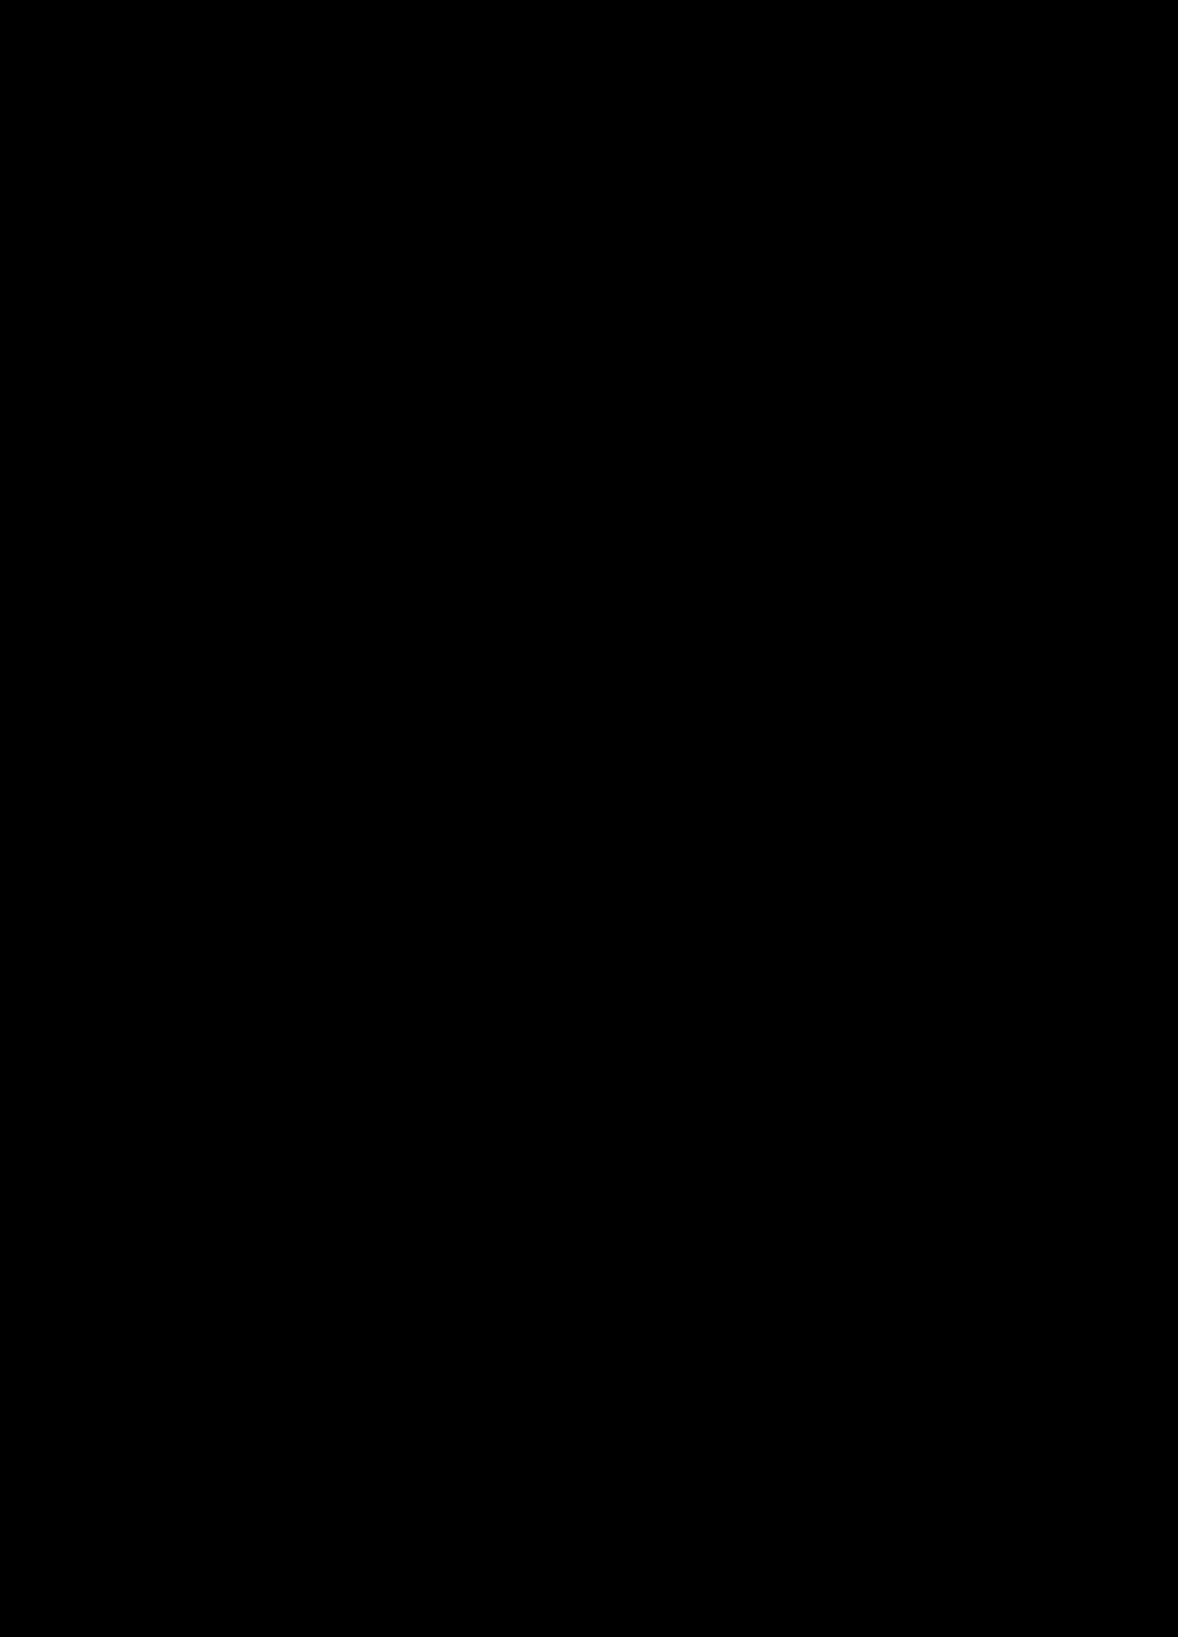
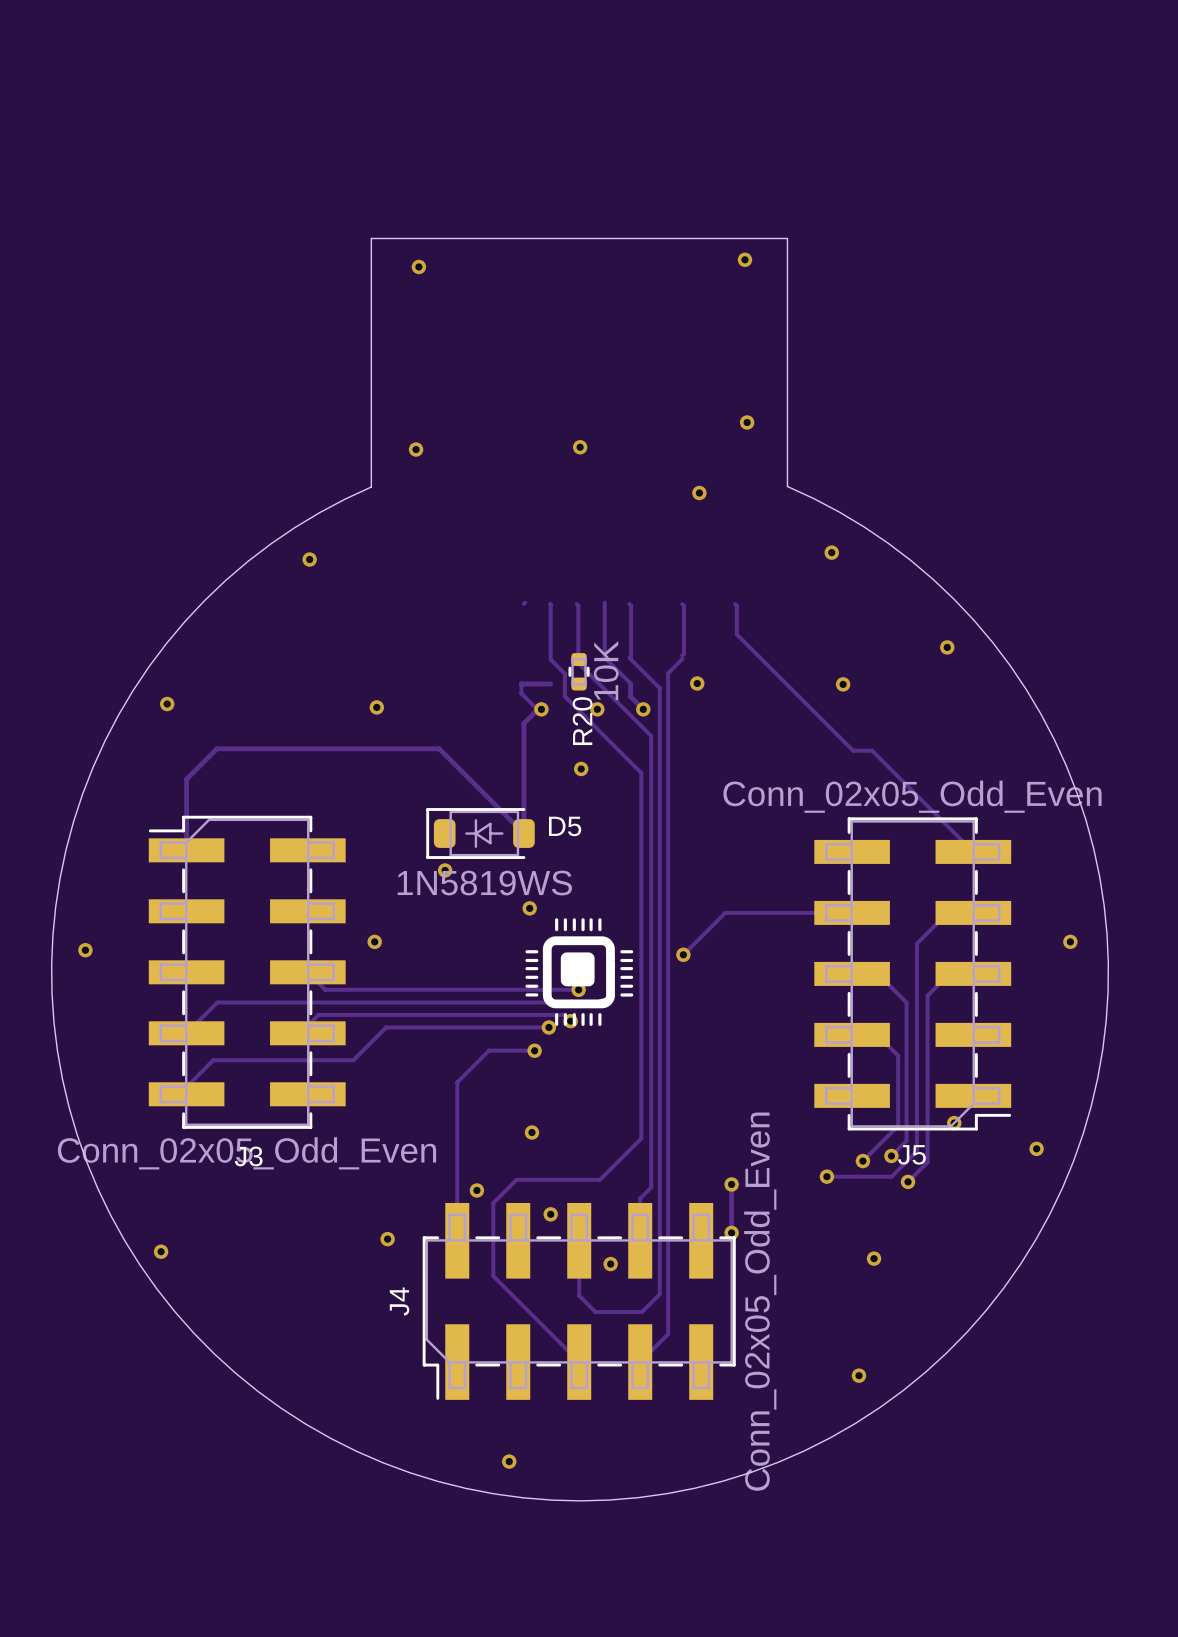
board edge: none -> (371, 238) (371, 487) (345, 499) (294, 527) (247, 561) (204, 600) (166, 643) (133, 690) (104, 741) (82, 794) (66, 849) (60, 878) (55, 906) (51, 964) (52, 993) (57, 1050) (69, 1107) (86, 1162) (110, 1215) (124, 1240) (156, 1288) (193, 1333) (235, 1373) (281, 1408) (330, 1438) (383, 1462) (437, 1481) (494, 1493) (522, 1497) (551, 1500) (609, 1500) (667, 1493) (723, 1481) (778, 1462) (830, 1437) (855, 1423) (903, 1390) (925, 1372) (967, 1332) (1004, 1287) (1036, 1239) (1049, 1214) (1073, 1161) (1091, 1106) (1102, 1049) (1108, 991) (1107, 934) (1099, 876) (1086, 820) (1066, 766) (1041, 714) (1010, 665) (973, 620) (933, 579) (888, 543) (839, 512) (787, 486) (787, 238) (371, 238)
via: none -> (744, 259)
via: none -> (418, 266)
via: none -> (747, 422)
via: none -> (580, 447)
via: none -> (416, 449)
via: none -> (699, 492)
via: none -> (831, 552)
via: none -> (309, 559)
track: none -> (525, 602) (523, 604)
track: none -> (604, 602) (604, 657) (630, 683) (630, 696) (643, 709)
track: none -> (550, 604) (550, 659) (564, 673) (564, 696) (641, 773) (641, 1138) (599, 1179) (516, 1179) (493, 1203) (493, 1276) (579, 1362)
track: none -> (576, 604) (578, 605) (578, 656) (576, 658)
track: none -> (629, 604) (631, 605) (631, 656) (629, 657)
track: none -> (682, 604) (683, 605) (683, 653) (682, 655)
track: none -> (735, 604) (736, 605) (736, 634) (853, 750) (872, 750) (973, 851)
via: none -> (947, 647)
track: none -> (579, 659) (579, 663) (651, 735) (651, 1187) (640, 1198) (640, 1240)
track: none -> (630, 659) (659, 688) (659, 1294) (642, 1312) (595, 1312) (579, 1295) (579, 1240)
track: none -> (682, 659) (668, 673) (668, 1334) (640, 1362)
R20: none -> 10K (579, 671)
via: none -> (697, 683)
track: none -> (521, 684) (550, 684)
track: none -> (522, 684) (521, 693) (537, 709) (541, 709) (537, 709) (523, 723) (523, 833) (439, 748) (216, 748) (186, 779) (186, 850)
via: none -> (843, 684)
via: none -> (167, 704)
via: none -> (376, 707)
via: none -> (541, 709)
via: none -> (597, 709)
via: none -> (643, 709)
via: none -> (581, 768)
D5: none -> 1N5819WS (480, 833)
via: none -> (445, 870)
via: none -> (529, 908)
track: none -> (852, 912) (725, 912) (683, 954)
track: none -> (973, 912) (947, 912) (916, 943) (916, 1151) (891, 1176) (826, 1176)
drawing: none -> [525, 918, 634, 1026]
via: none -> (374, 941)
via: none -> (1070, 941)
via: none -> (85, 950)
via: none -> (683, 954)
J3: none -> Conn_02x05_Odd_Even (247, 972)
track: none -> (307, 972) (325, 989) (578, 989)
track: none -> (852, 973) (877, 973) (906, 1002) (906, 1140) (890, 1156)
J5: none -> Conn_02x05_Odd_Even (912, 973)
track: none -> (973, 973) (949, 973) (927, 995) (927, 1162) (908, 1181)
via: none -> (578, 989)
track: none -> (544, 1002) (217, 1002) (186, 1033)
track: none -> (570, 1021) (564, 1014) (318, 1014) (307, 1025) (307, 1033)
via: none -> (570, 1021)
track: none -> (548, 1027) (386, 1027) (353, 1060) (213, 1060) (186, 1086) (186, 1094)
via: none -> (548, 1027)
track: none -> (852, 1034) (877, 1034) (898, 1055) (898, 1125) (862, 1161)
track: none -> (534, 1050) (488, 1050) (457, 1082) (457, 1240)
via: none -> (534, 1050)
via: none -> (954, 1123)
via: none -> (531, 1132)
via: none -> (1036, 1148)
via: none -> (891, 1155)
via: none -> (862, 1161)
via: none -> (826, 1176)
via: none -> (908, 1181)
track: none -> (731, 1184) (731, 1232)
via: none -> (731, 1184)
via: none -> (476, 1190)
via: none -> (550, 1214)
via: none -> (731, 1232)
via: none -> (387, 1239)
via: none -> (161, 1251)
via: none -> (874, 1258)
via: none -> (610, 1264)
J4: none -> Conn_02x05_Odd_Even (579, 1301)
via: none -> (858, 1375)
via: none -> (509, 1461)

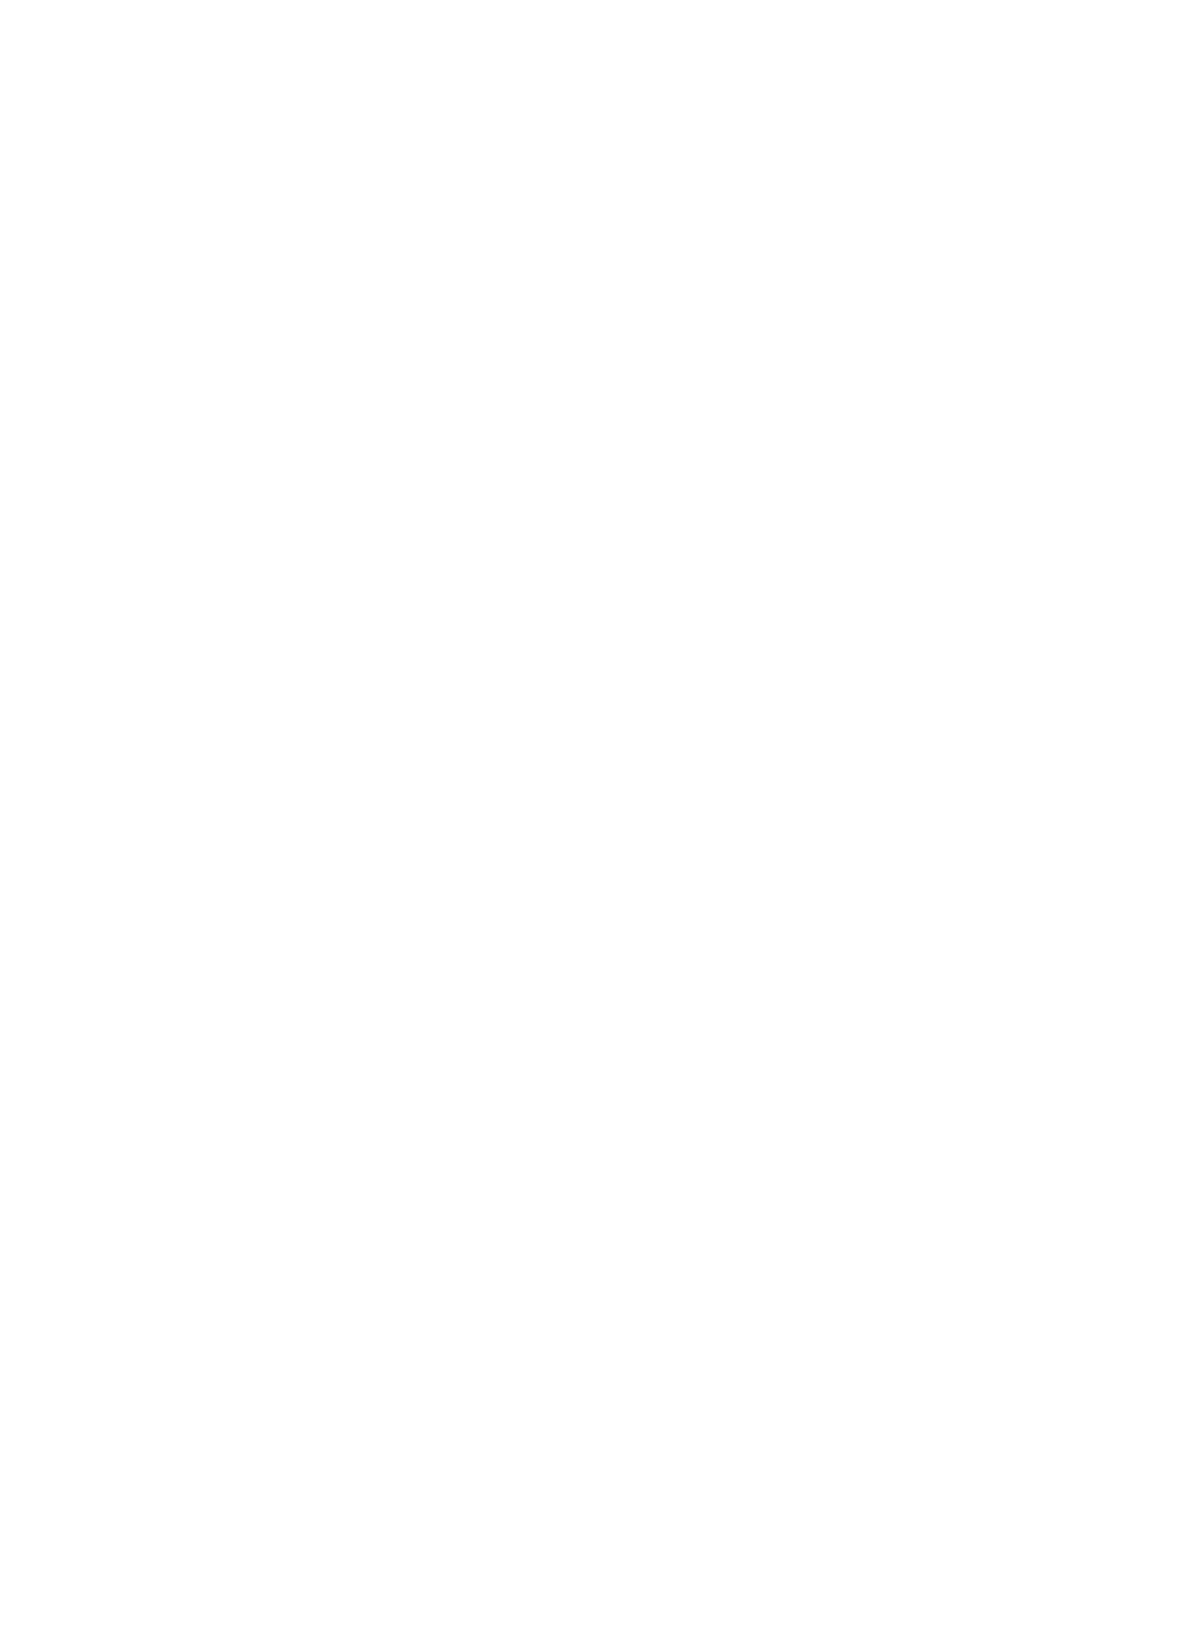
board edge: (371, 238) (371, 487) (345, 499) (294, 527) (247, 561) (204, 600) (166, 643) (133, 690) (104, 741) (82, 794) (66, 849) (60, 878) (55, 906) (51, 964) (52, 993) (57, 1050) (69, 1107) (86, 1162) (110, 1215) (124, 1240) (156, 1288) (193, 1333) (235, 1373) (281, 1408) (330, 1438) (383, 1462) (437, 1481) (494, 1493) (522, 1497) (551, 1500) (609, 1500) (667, 1493) (723, 1481) (778, 1462) (830, 1437) (855, 1423) (903, 1390) (925, 1372) (967, 1332) (1004, 1287) (1036, 1239) (1049, 1214) (1073, 1161) (1091, 1106) (1102, 1049) (1108, 991) (1107, 934) (1099, 876) (1086, 820) (1066, 766) (1041, 714) (1010, 665) (973, 620) (933, 579) (888, 543) (839, 512) (787, 486) (787, 238) (371, 238) -> none
via: (744, 259) -> none
via: (418, 266) -> none
via: (747, 422) -> none
via: (580, 447) -> none
via: (416, 449) -> none
via: (699, 492) -> none
via: (831, 552) -> none
via: (309, 559) -> none
track: (525, 602) (523, 604) -> none
track: (604, 602) (604, 657) (630, 683) (630, 696) (643, 709) -> none
track: (550, 604) (550, 659) (564, 673) (564, 696) (641, 773) (641, 1138) (599, 1179) (516, 1179) (493, 1203) (493, 1276) (579, 1362) -> none
track: (576, 604) (578, 605) (578, 656) (576, 658) -> none
track: (629, 604) (631, 605) (631, 656) (629, 657) -> none
track: (682, 604) (683, 605) (683, 653) (682, 655) -> none
track: (735, 604) (736, 605) (736, 634) (853, 750) (872, 750) (973, 851) -> none
via: (947, 647) -> none
track: (579, 659) (579, 663) (651, 735) (651, 1187) (640, 1198) (640, 1240) -> none
track: (630, 659) (659, 688) (659, 1294) (642, 1312) (595, 1312) (579, 1295) (579, 1240) -> none
track: (682, 659) (668, 673) (668, 1334) (640, 1362) -> none
R20: 10K (579, 671) -> none
via: (697, 683) -> none
track: (521, 684) (550, 684) -> none
track: (522, 684) (521, 693) (537, 709) (541, 709) (537, 709) (523, 723) (523, 833) (439, 748) (216, 748) (186, 779) (186, 850) -> none
via: (843, 684) -> none
via: (167, 704) -> none
via: (376, 707) -> none
via: (541, 709) -> none
via: (597, 709) -> none
via: (643, 709) -> none
via: (581, 768) -> none
D5: 1N5819WS (480, 833) -> none
via: (445, 870) -> none
via: (529, 908) -> none
track: (852, 912) (725, 912) (683, 954) -> none
track: (973, 912) (947, 912) (916, 943) (916, 1151) (891, 1176) (826, 1176) -> none
drawing: [525, 918, 634, 1026] -> none
via: (374, 941) -> none
via: (1070, 941) -> none
via: (85, 950) -> none
via: (683, 954) -> none
J3: Conn_02x05_Odd_Even (247, 972) -> none
track: (307, 972) (325, 989) (578, 989) -> none
track: (852, 973) (877, 973) (906, 1002) (906, 1140) (890, 1156) -> none
J5: Conn_02x05_Odd_Even (912, 973) -> none
track: (973, 973) (949, 973) (927, 995) (927, 1162) (908, 1181) -> none
via: (578, 989) -> none
track: (544, 1002) (217, 1002) (186, 1033) -> none
track: (570, 1021) (564, 1014) (318, 1014) (307, 1025) (307, 1033) -> none
via: (570, 1021) -> none
track: (548, 1027) (386, 1027) (353, 1060) (213, 1060) (186, 1086) (186, 1094) -> none
via: (548, 1027) -> none
track: (852, 1034) (877, 1034) (898, 1055) (898, 1125) (862, 1161) -> none
track: (534, 1050) (488, 1050) (457, 1082) (457, 1240) -> none
via: (534, 1050) -> none
via: (954, 1123) -> none
via: (531, 1132) -> none
via: (1036, 1148) -> none
via: (891, 1155) -> none
via: (862, 1161) -> none
via: (826, 1176) -> none
via: (908, 1181) -> none
track: (731, 1184) (731, 1232) -> none
via: (731, 1184) -> none
via: (476, 1190) -> none
via: (550, 1214) -> none
via: (731, 1232) -> none
via: (387, 1239) -> none
via: (161, 1251) -> none
via: (874, 1258) -> none
via: (610, 1264) -> none
J4: Conn_02x05_Odd_Even (579, 1301) -> none
via: (858, 1375) -> none
via: (509, 1461) -> none

